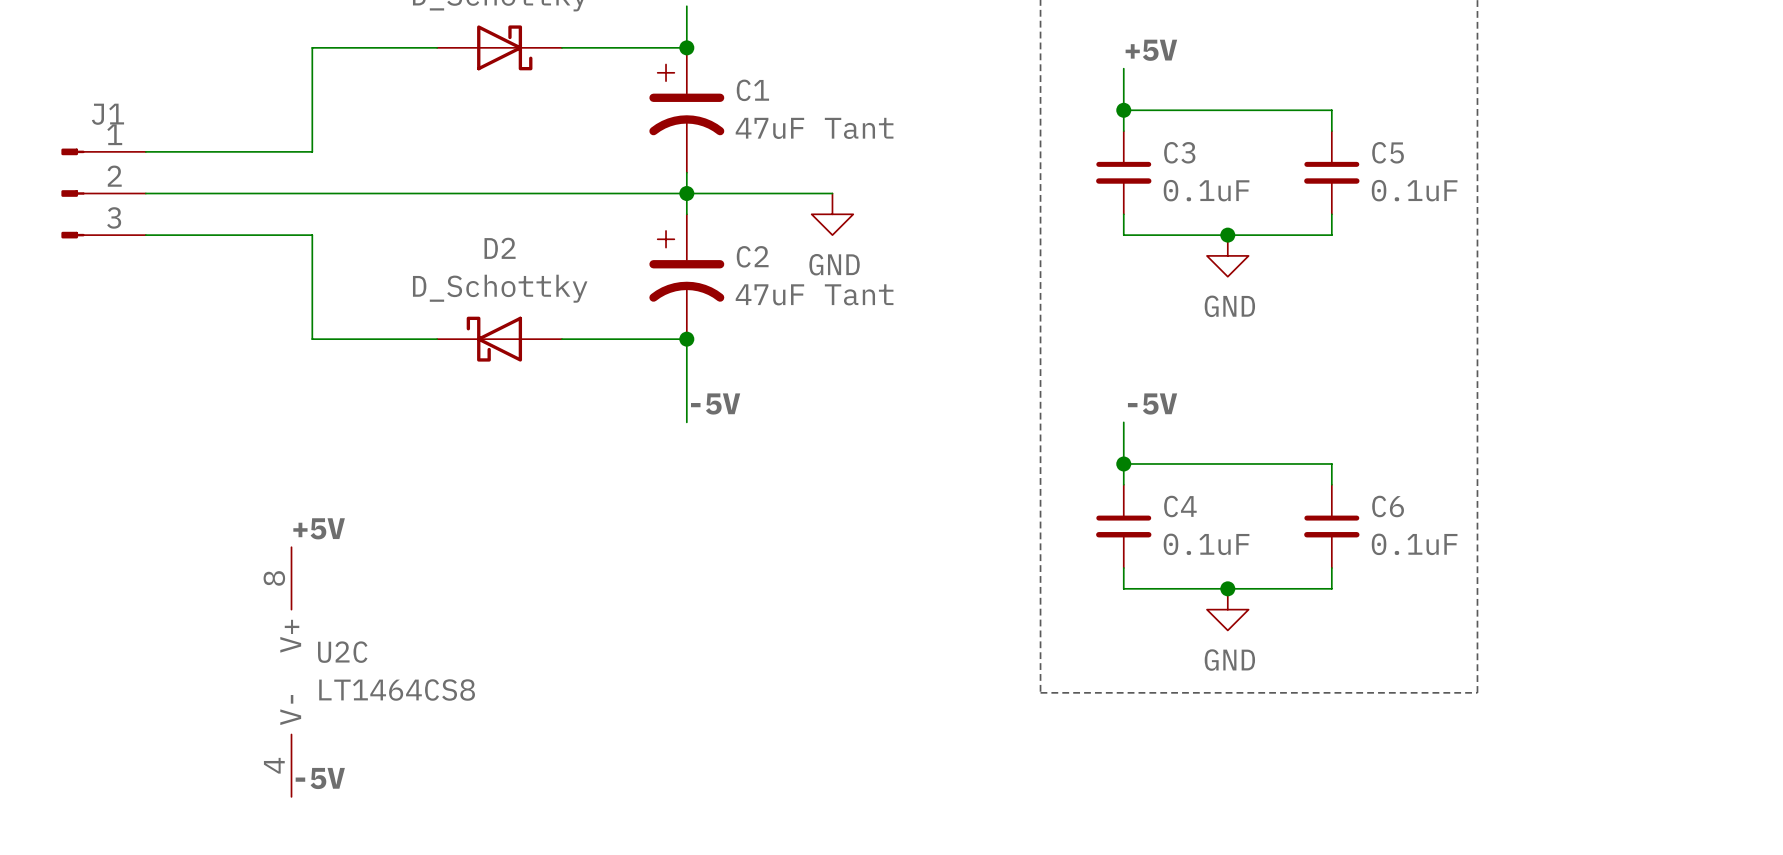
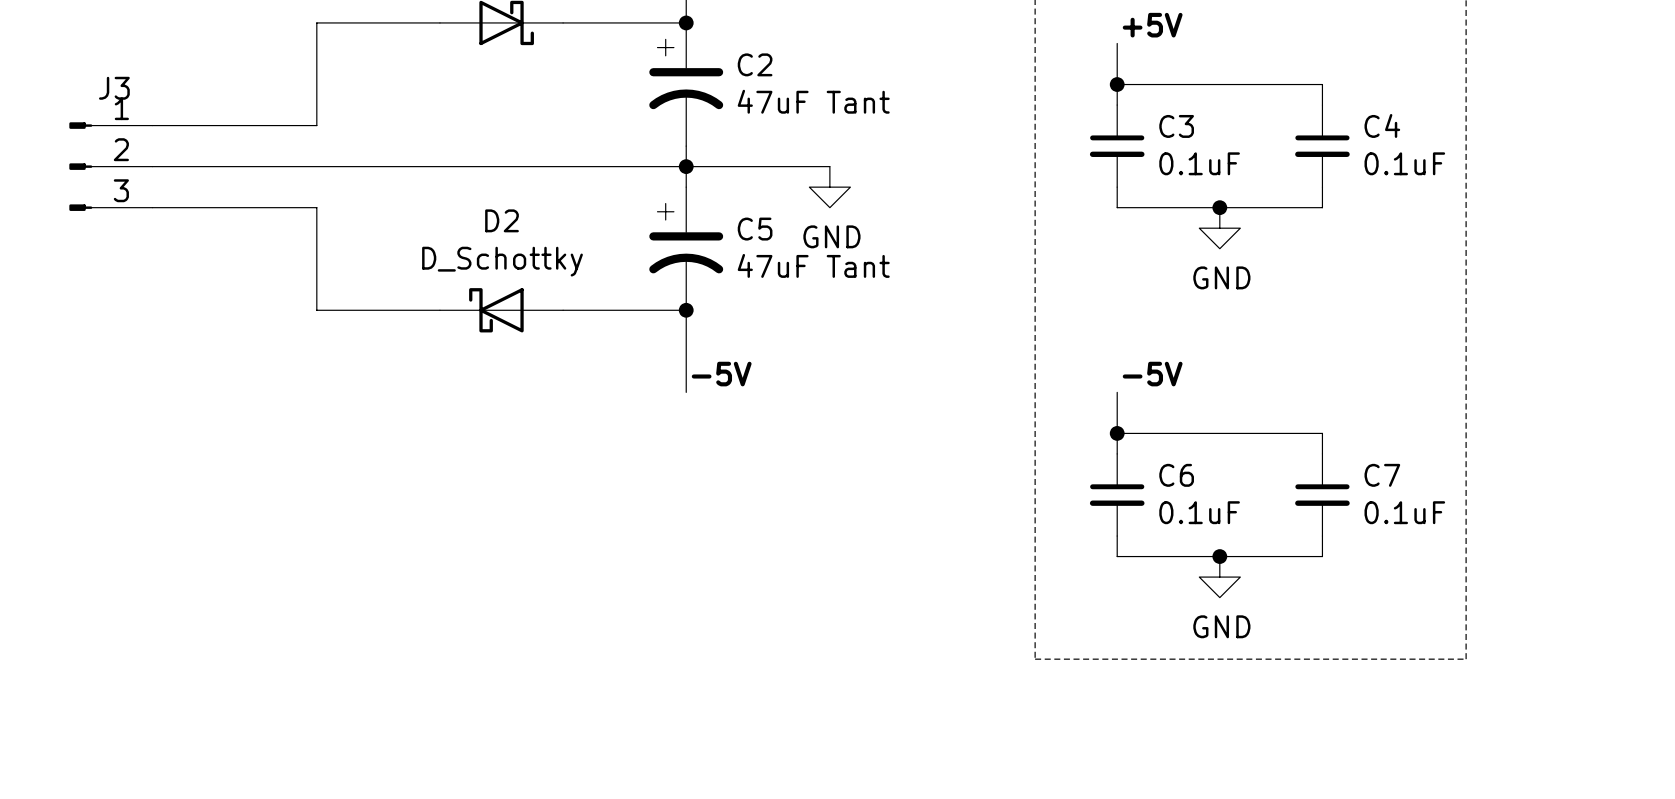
C1 name: C1 (752, 90) -> C2 (755, 64)
J1 name: J1 (107, 114) -> J3 (114, 88)
C5 name: C5 (1388, 152) -> C4 (1382, 125)
C2 name: C2 (752, 256) -> C5 (755, 229)
C4 name: C4 (1180, 506) -> C6 (1176, 475)
C6 name: C6 (1388, 506) -> C7 (1382, 475)
label: +5V (319, 528) -> none
U2C: LT1464CS8 (291, 672) -> none
label: -5V (320, 778) -> none

